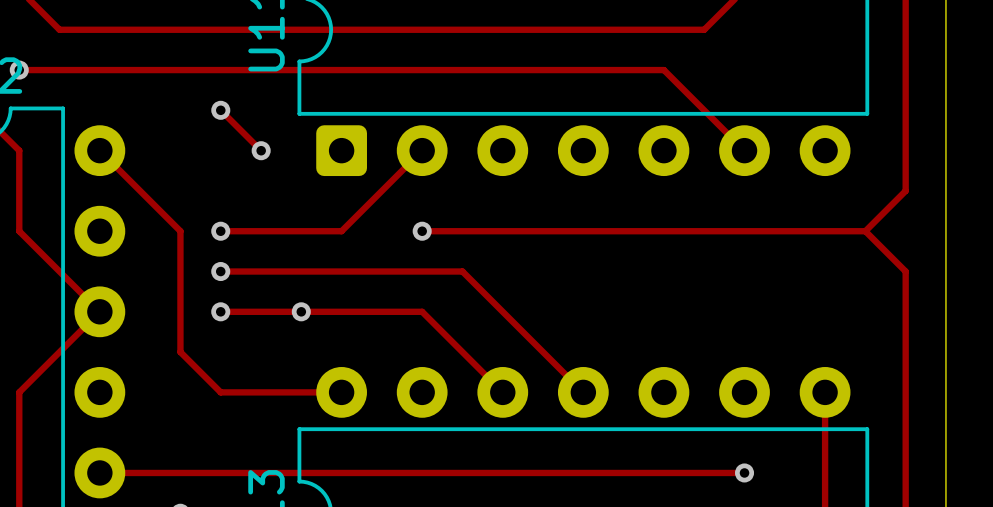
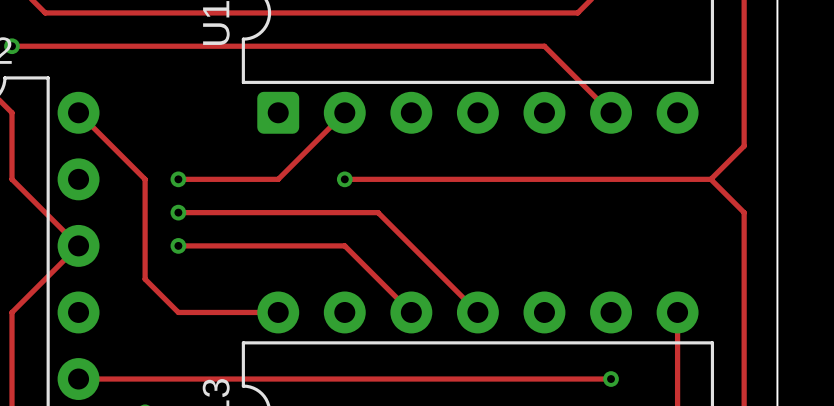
via: (220, 110) -> none
track: (220, 112) (220, 110) (261, 150) -> none
via: (261, 150) -> none
via: (301, 311) -> none

